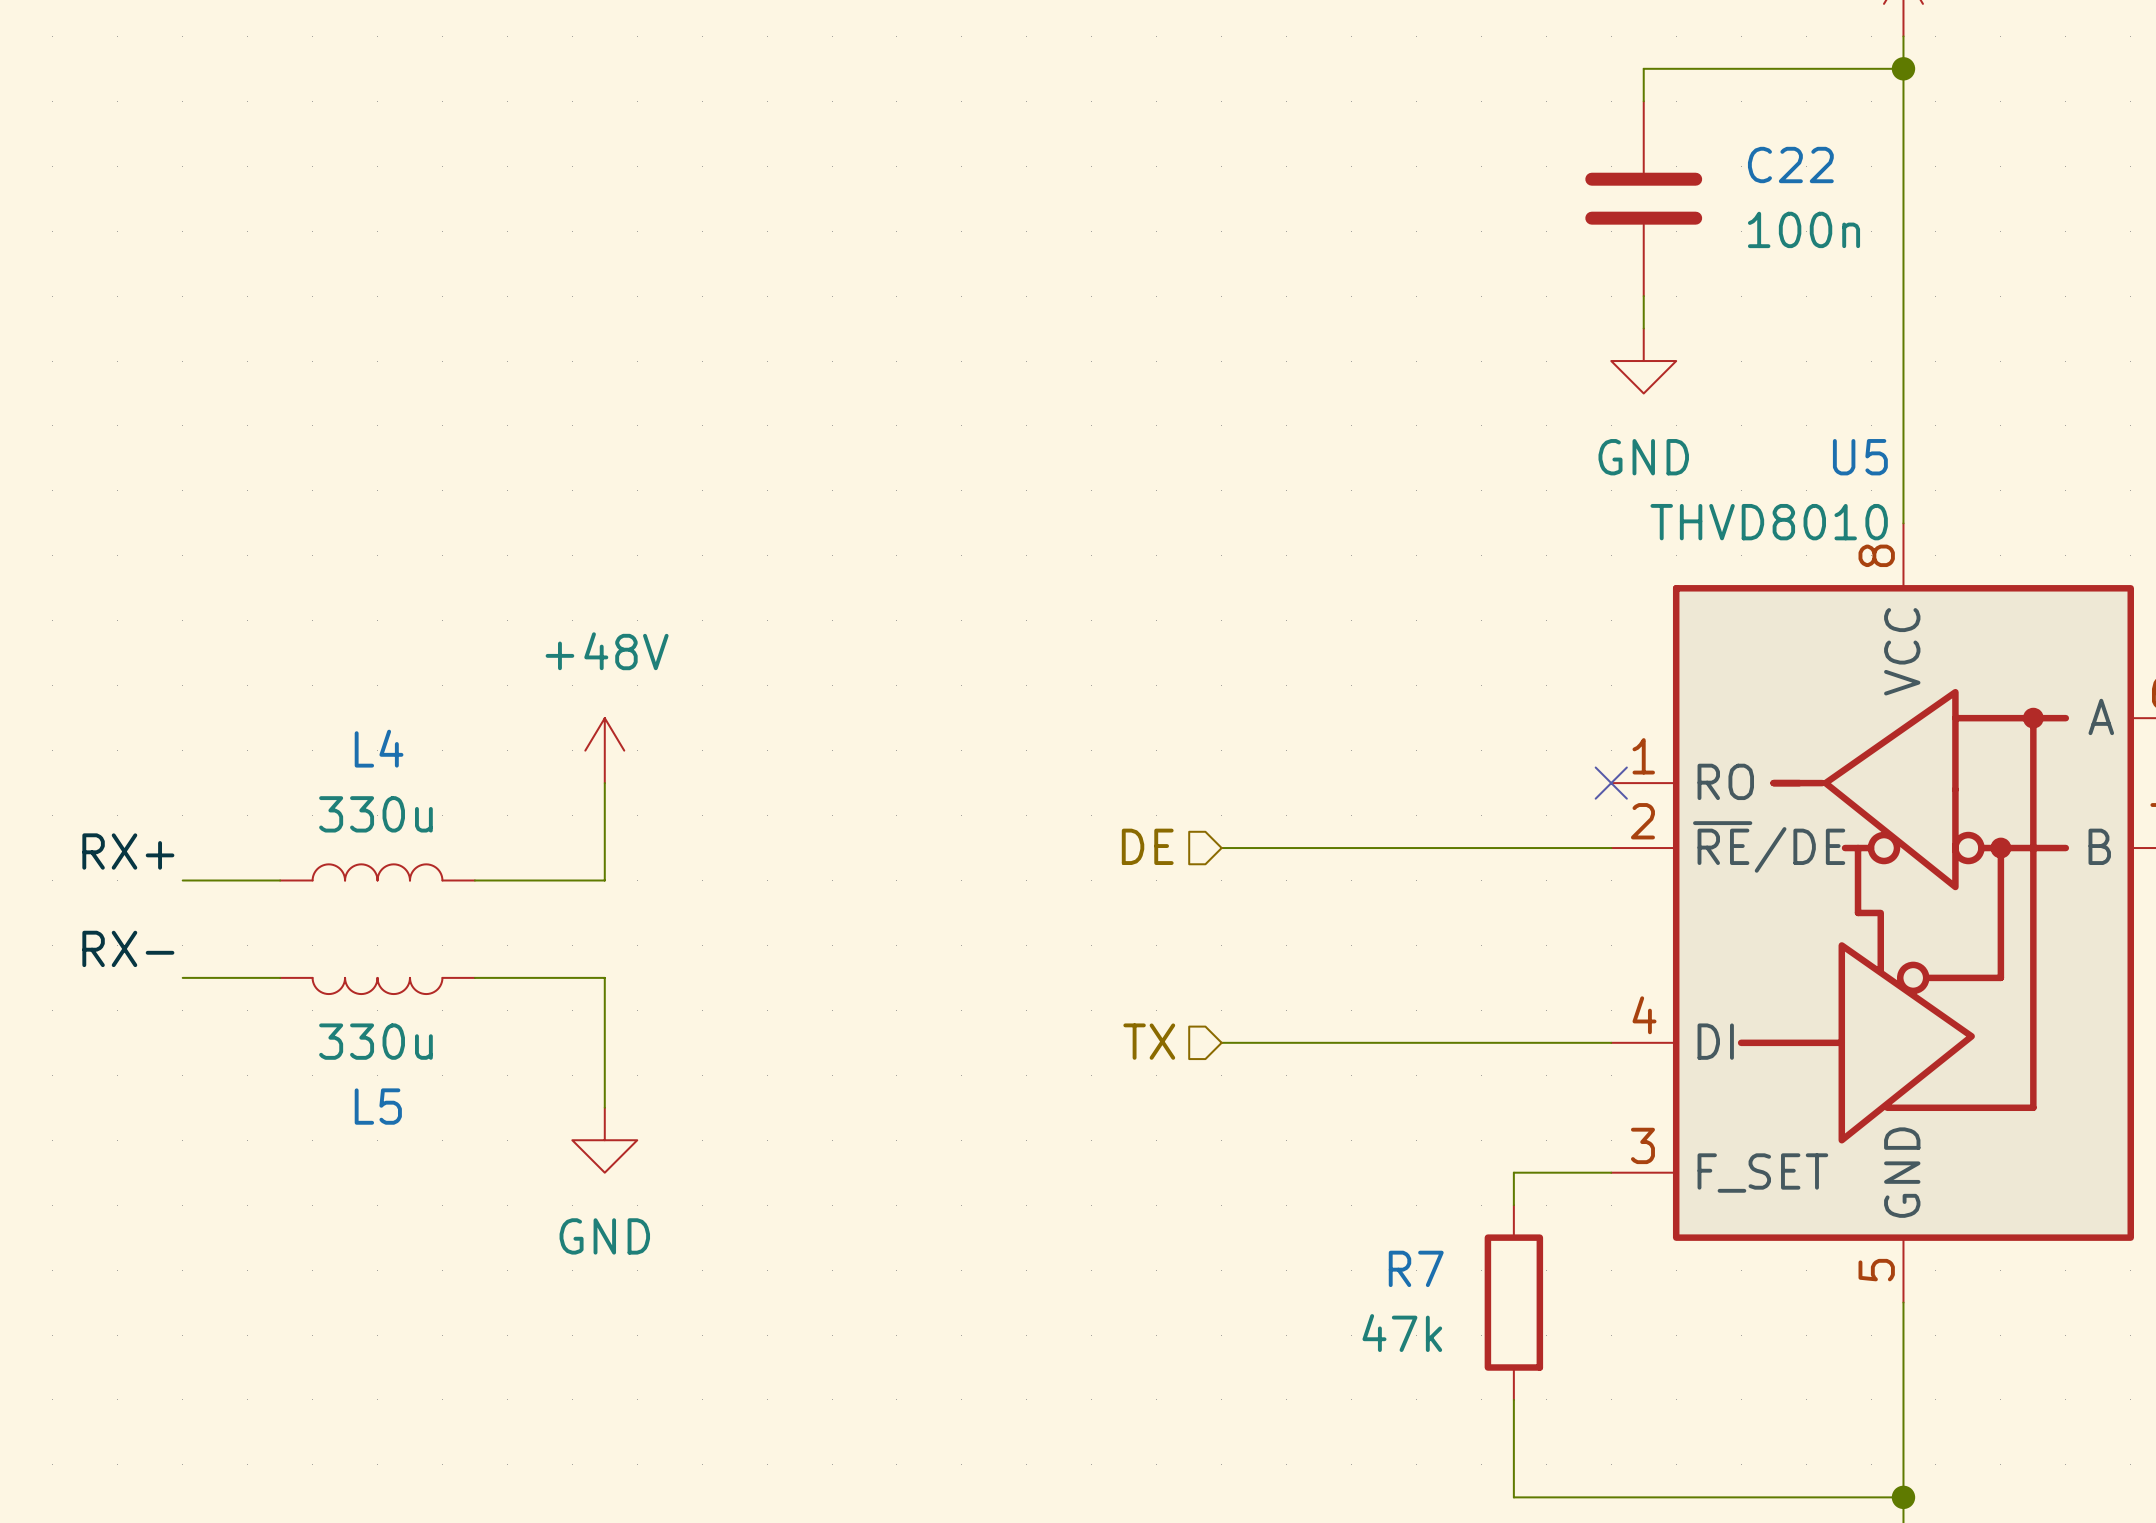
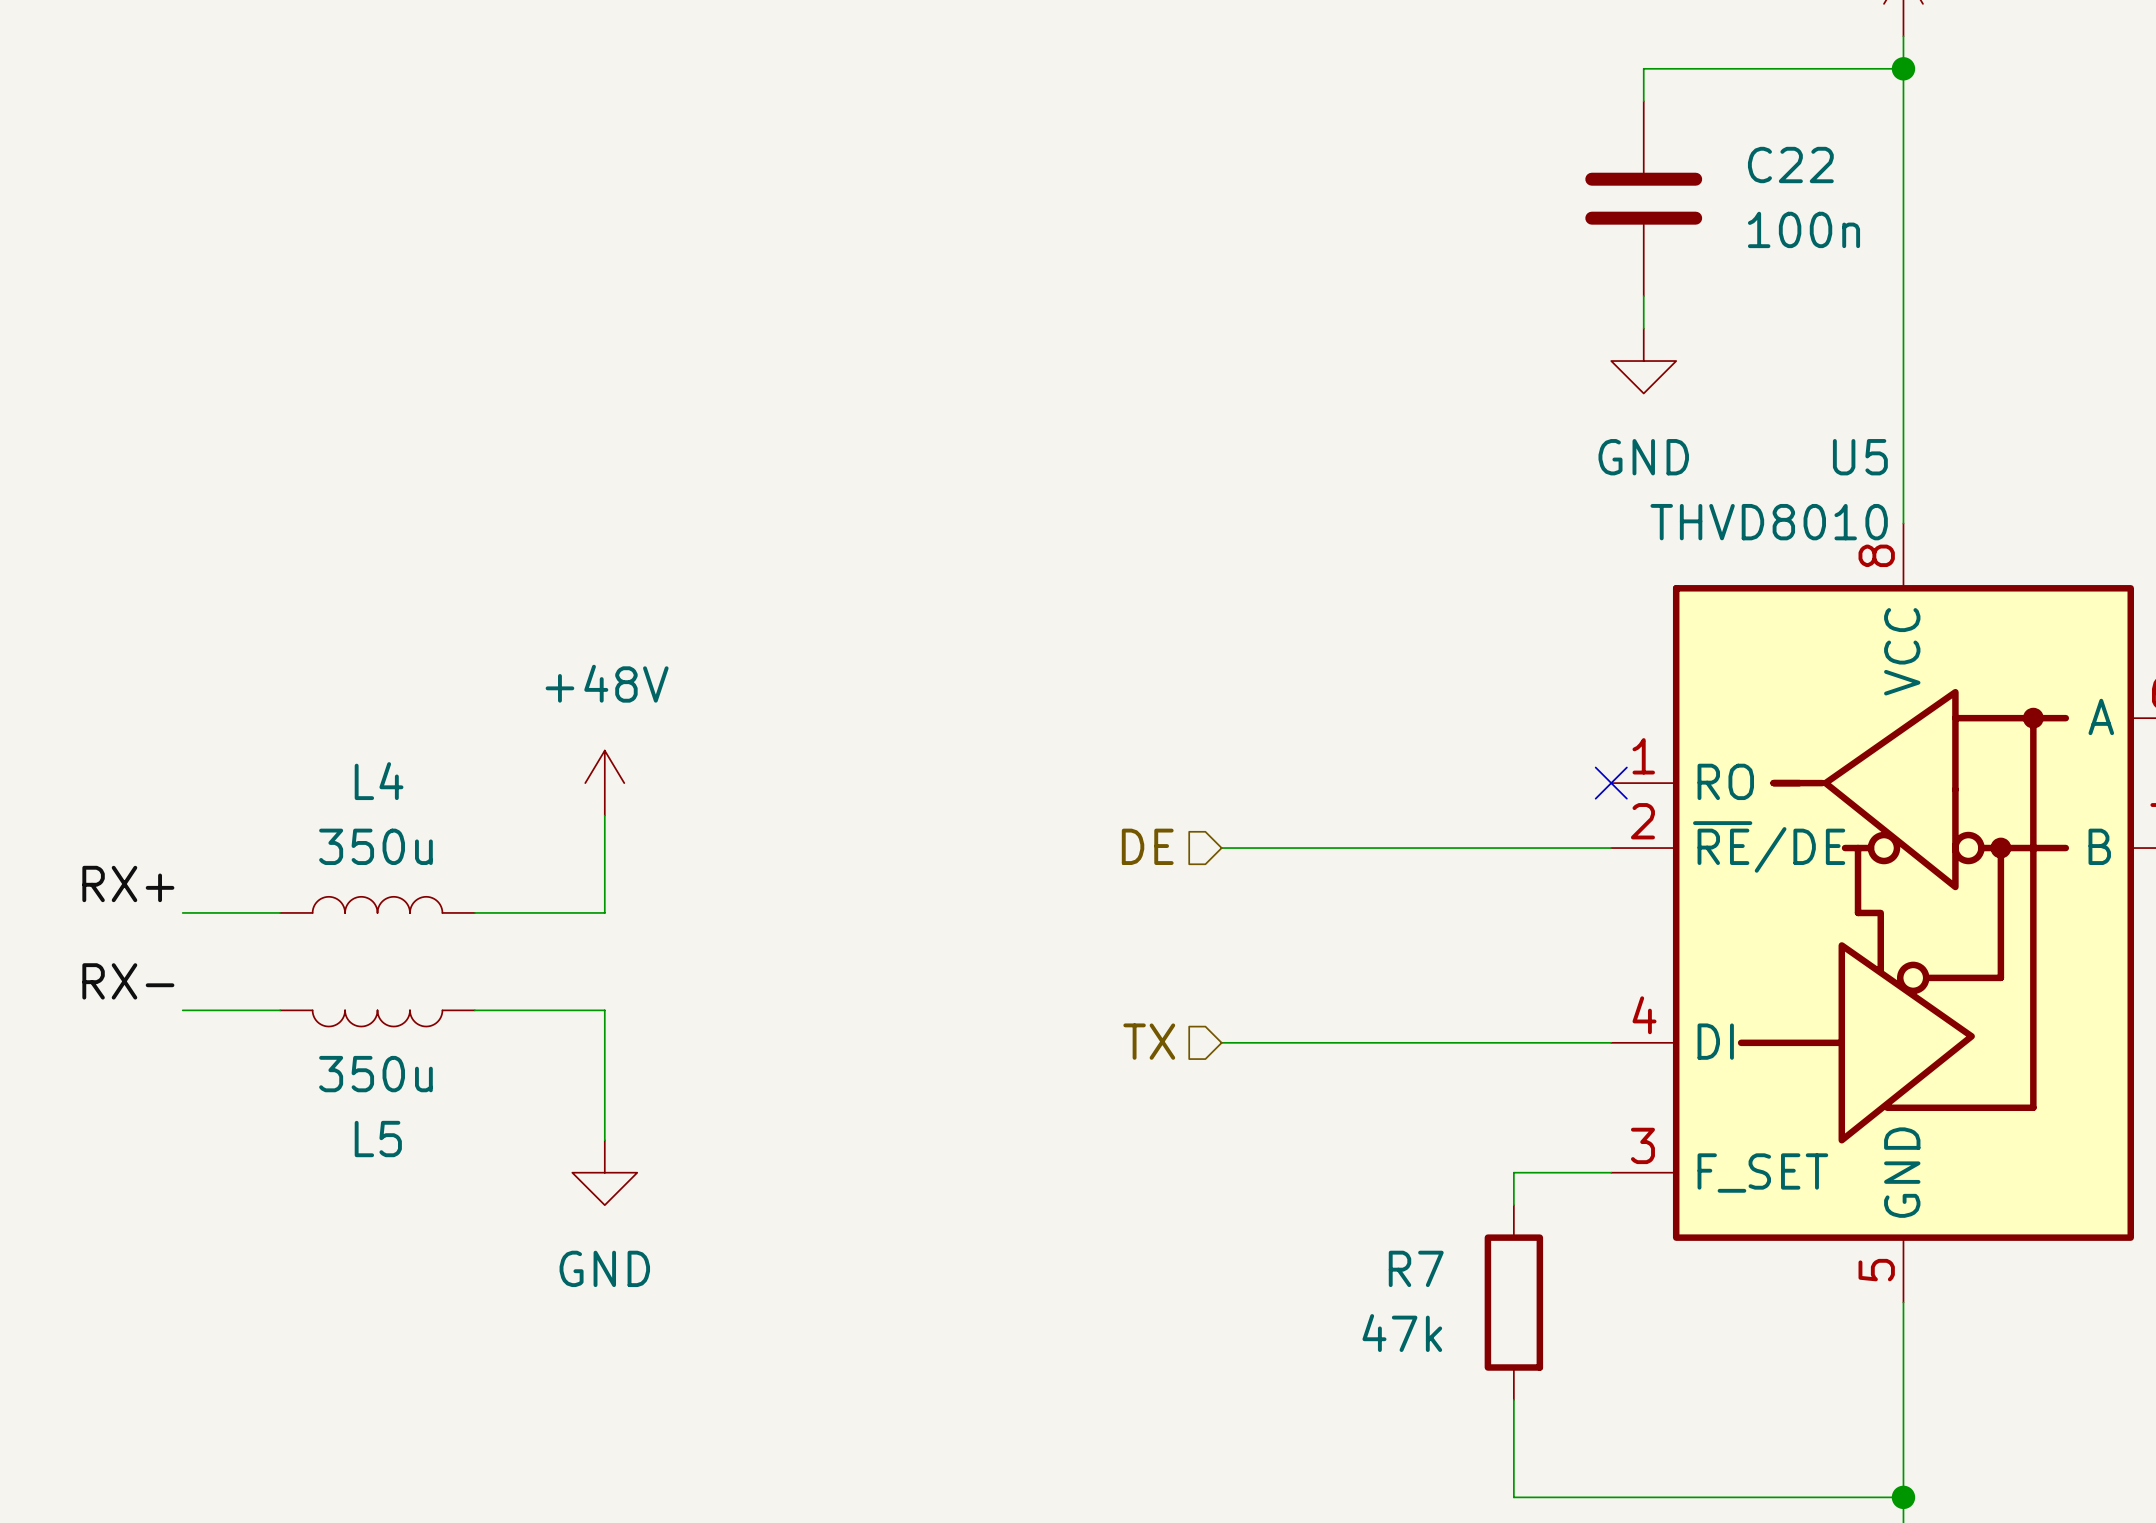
power symbol position: +48V (604, 750) -> +48V (604, 783)
L4 value: 330u (375, 814) -> 350u (375, 846)
label position: RX+ (128, 851) -> RX+ (128, 883)
L4 position: (377, 872) -> (377, 904)
wire: (182, 880) (280, 880) -> (182, 912) (280, 912)
wire: (474, 880) (604, 880) -> (474, 912) (604, 912) (604, 880)
label position: RX- (128, 948) -> RX- (128, 981)
wire: (182, 977) (280, 977) -> (182, 1010) (280, 1010)
wire: (474, 977) (604, 977) (604, 1010) -> (474, 1010) (604, 1010)
L5 position: (377, 985) -> (377, 1018)
L5 value: 330u (375, 1041) -> 350u (375, 1074)
power symbol position: GND (604, 1140) -> GND (604, 1172)

